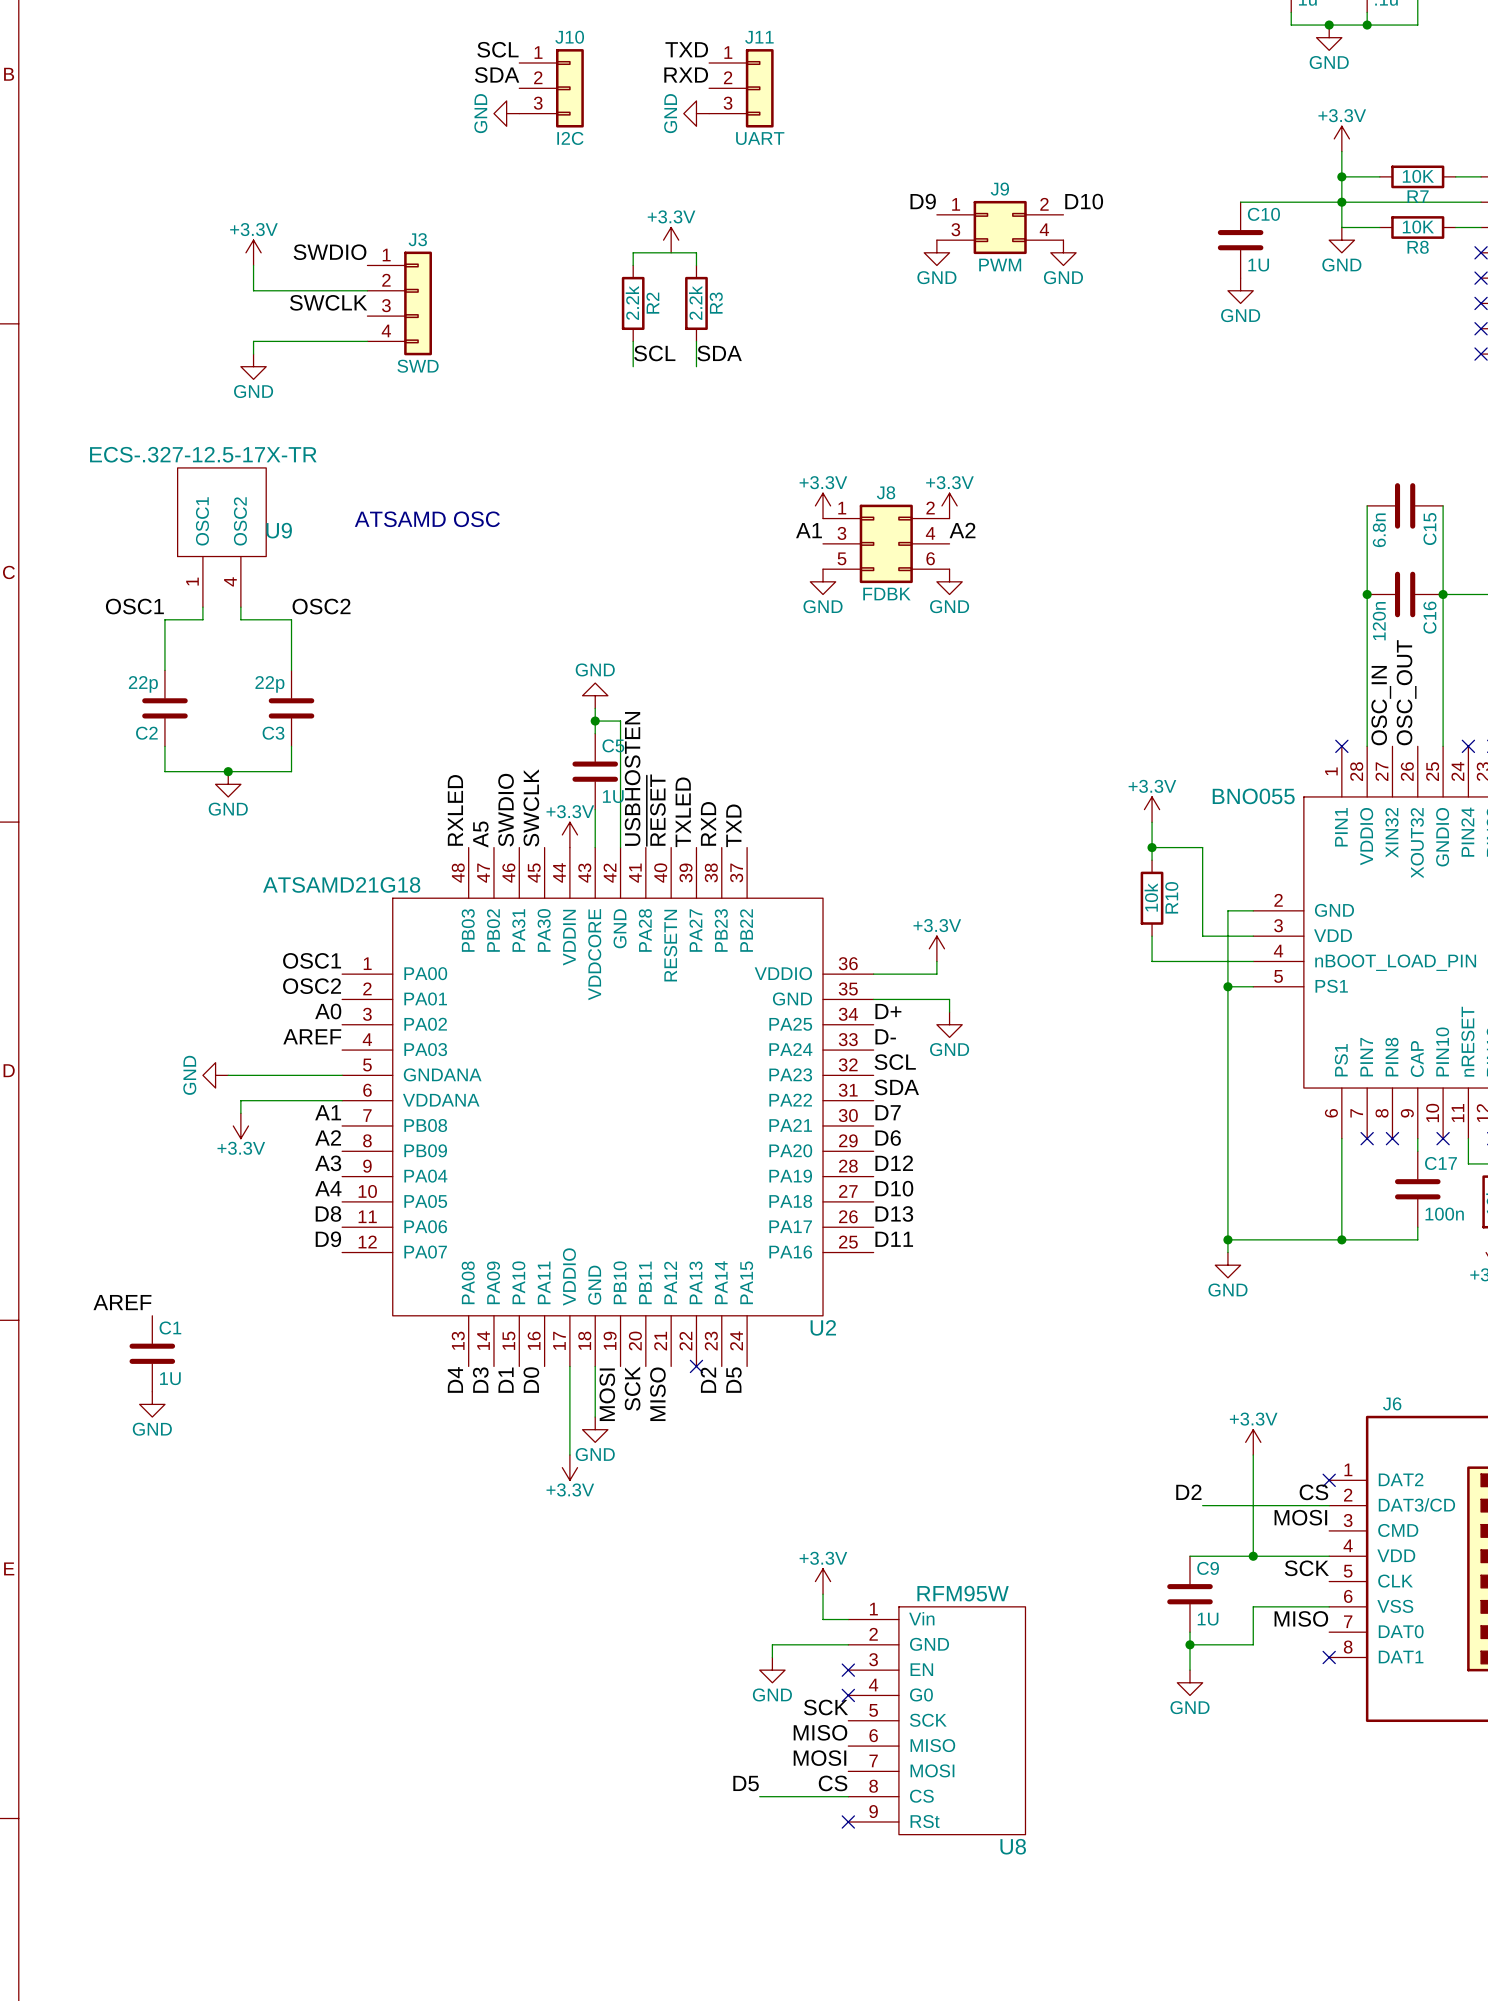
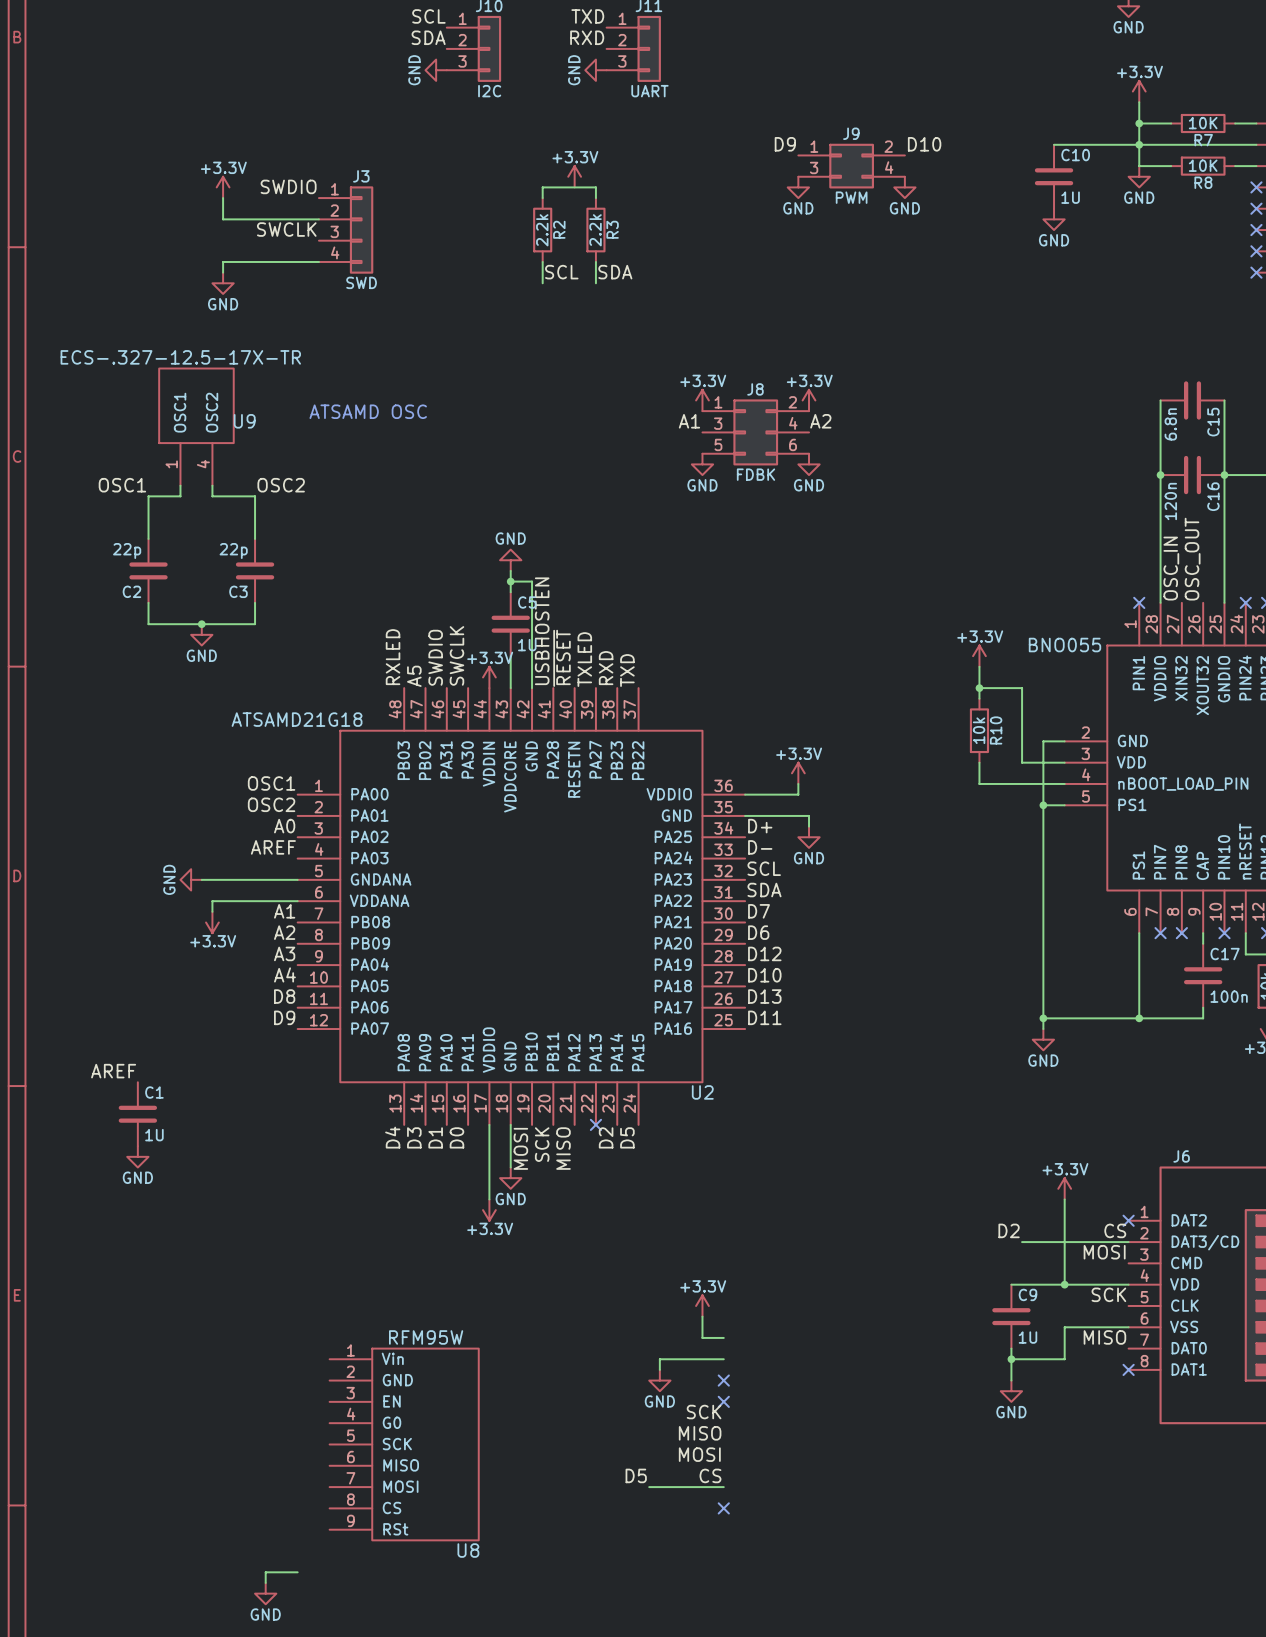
U8 position: (936, 1720) -> (404, 1444)
wire: none -> (297, 1572) (265, 1572) (265, 1582)
power symbol: none -> GND (265, 1593)

